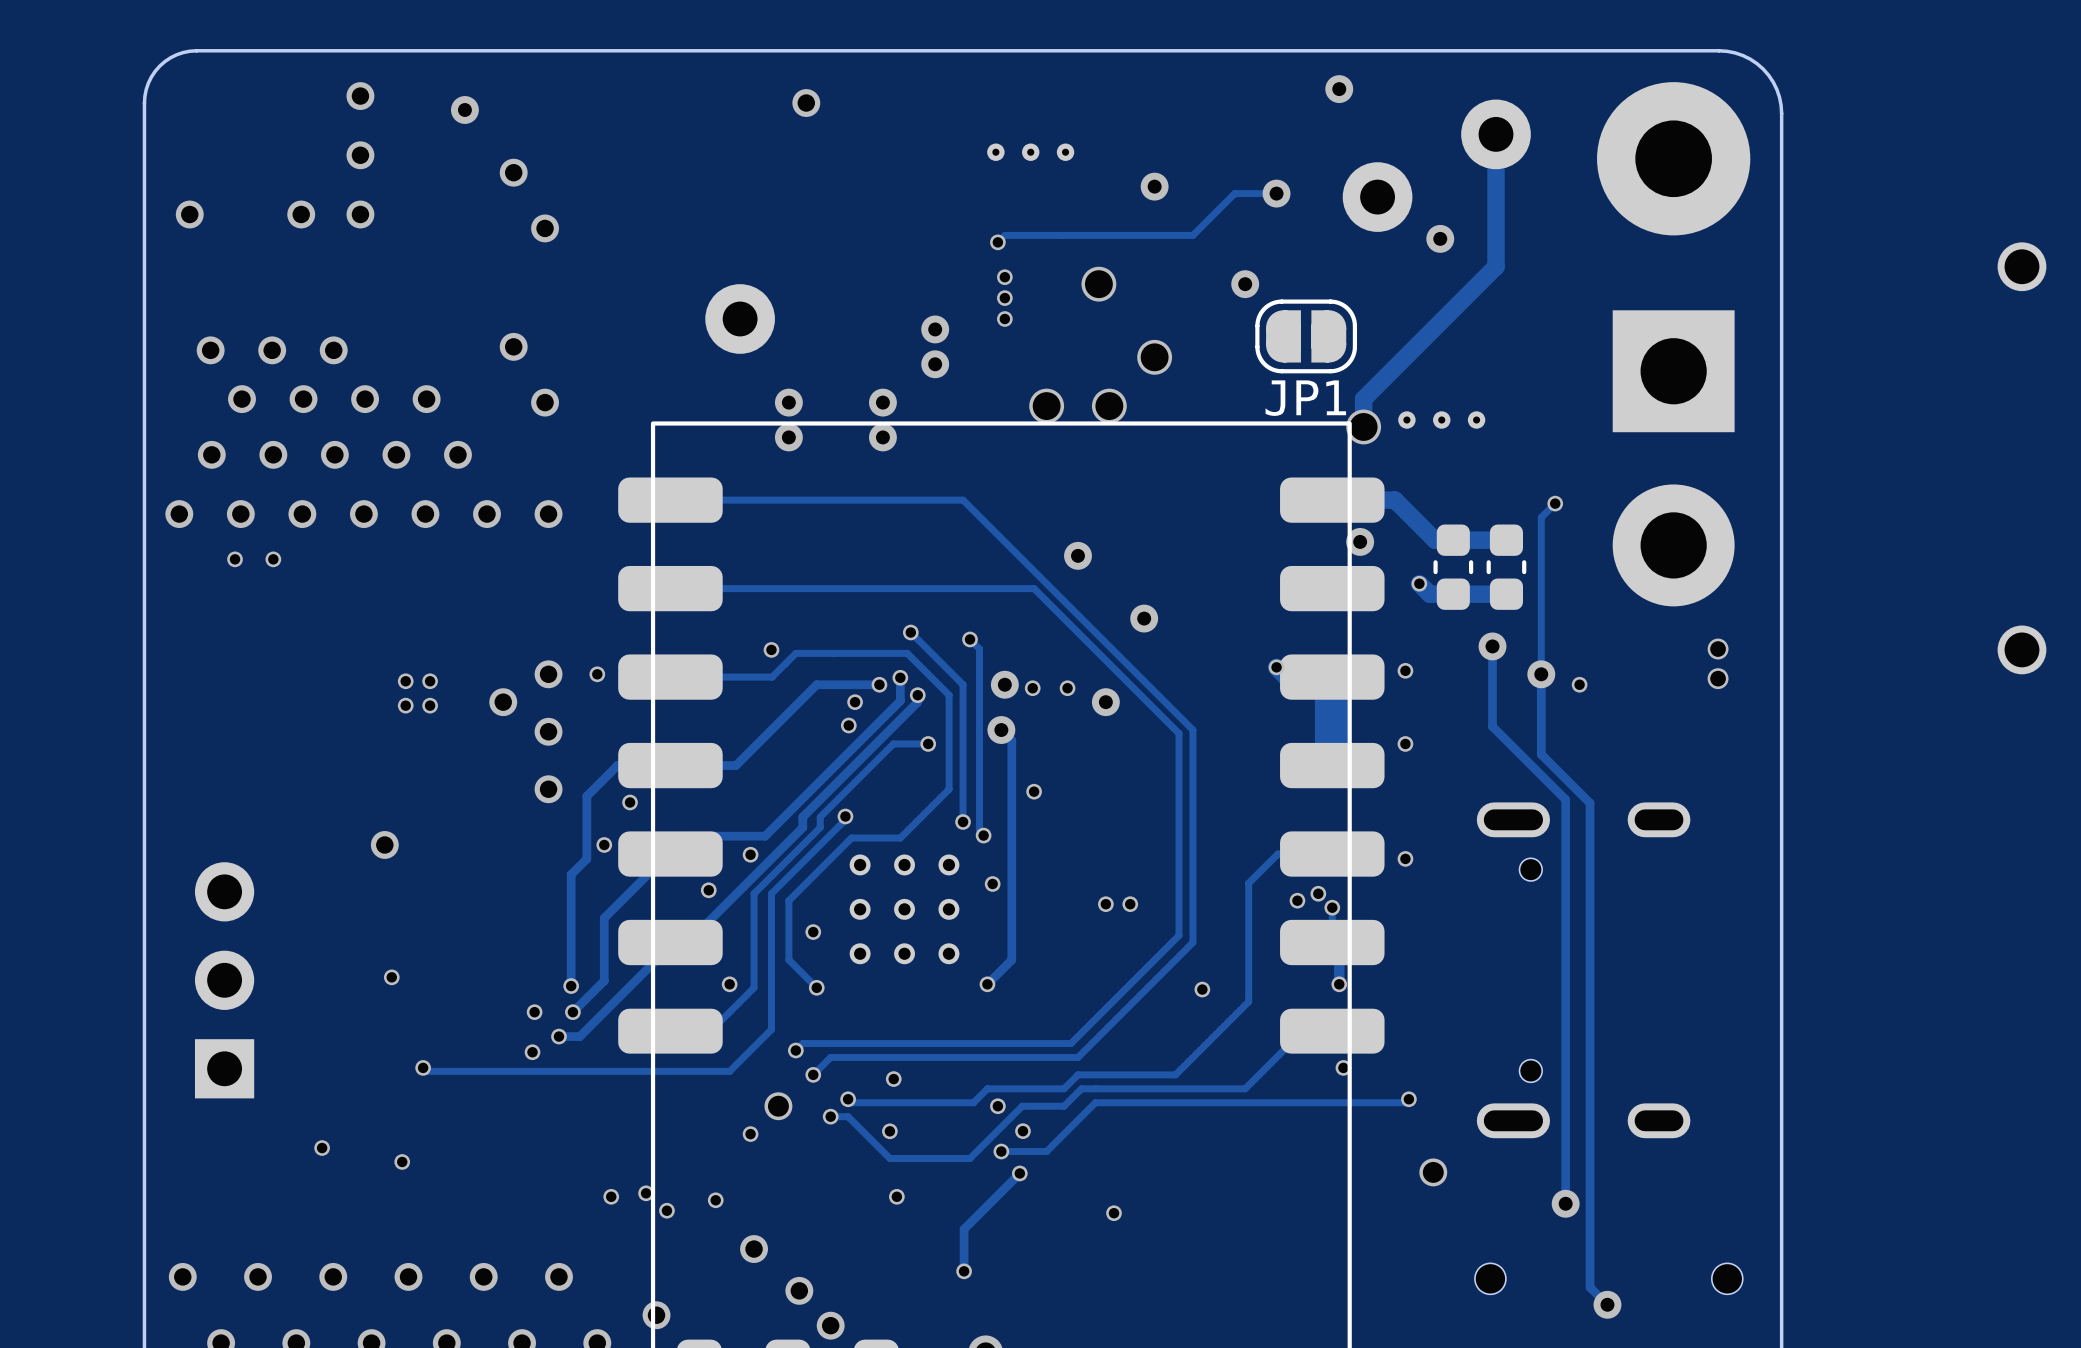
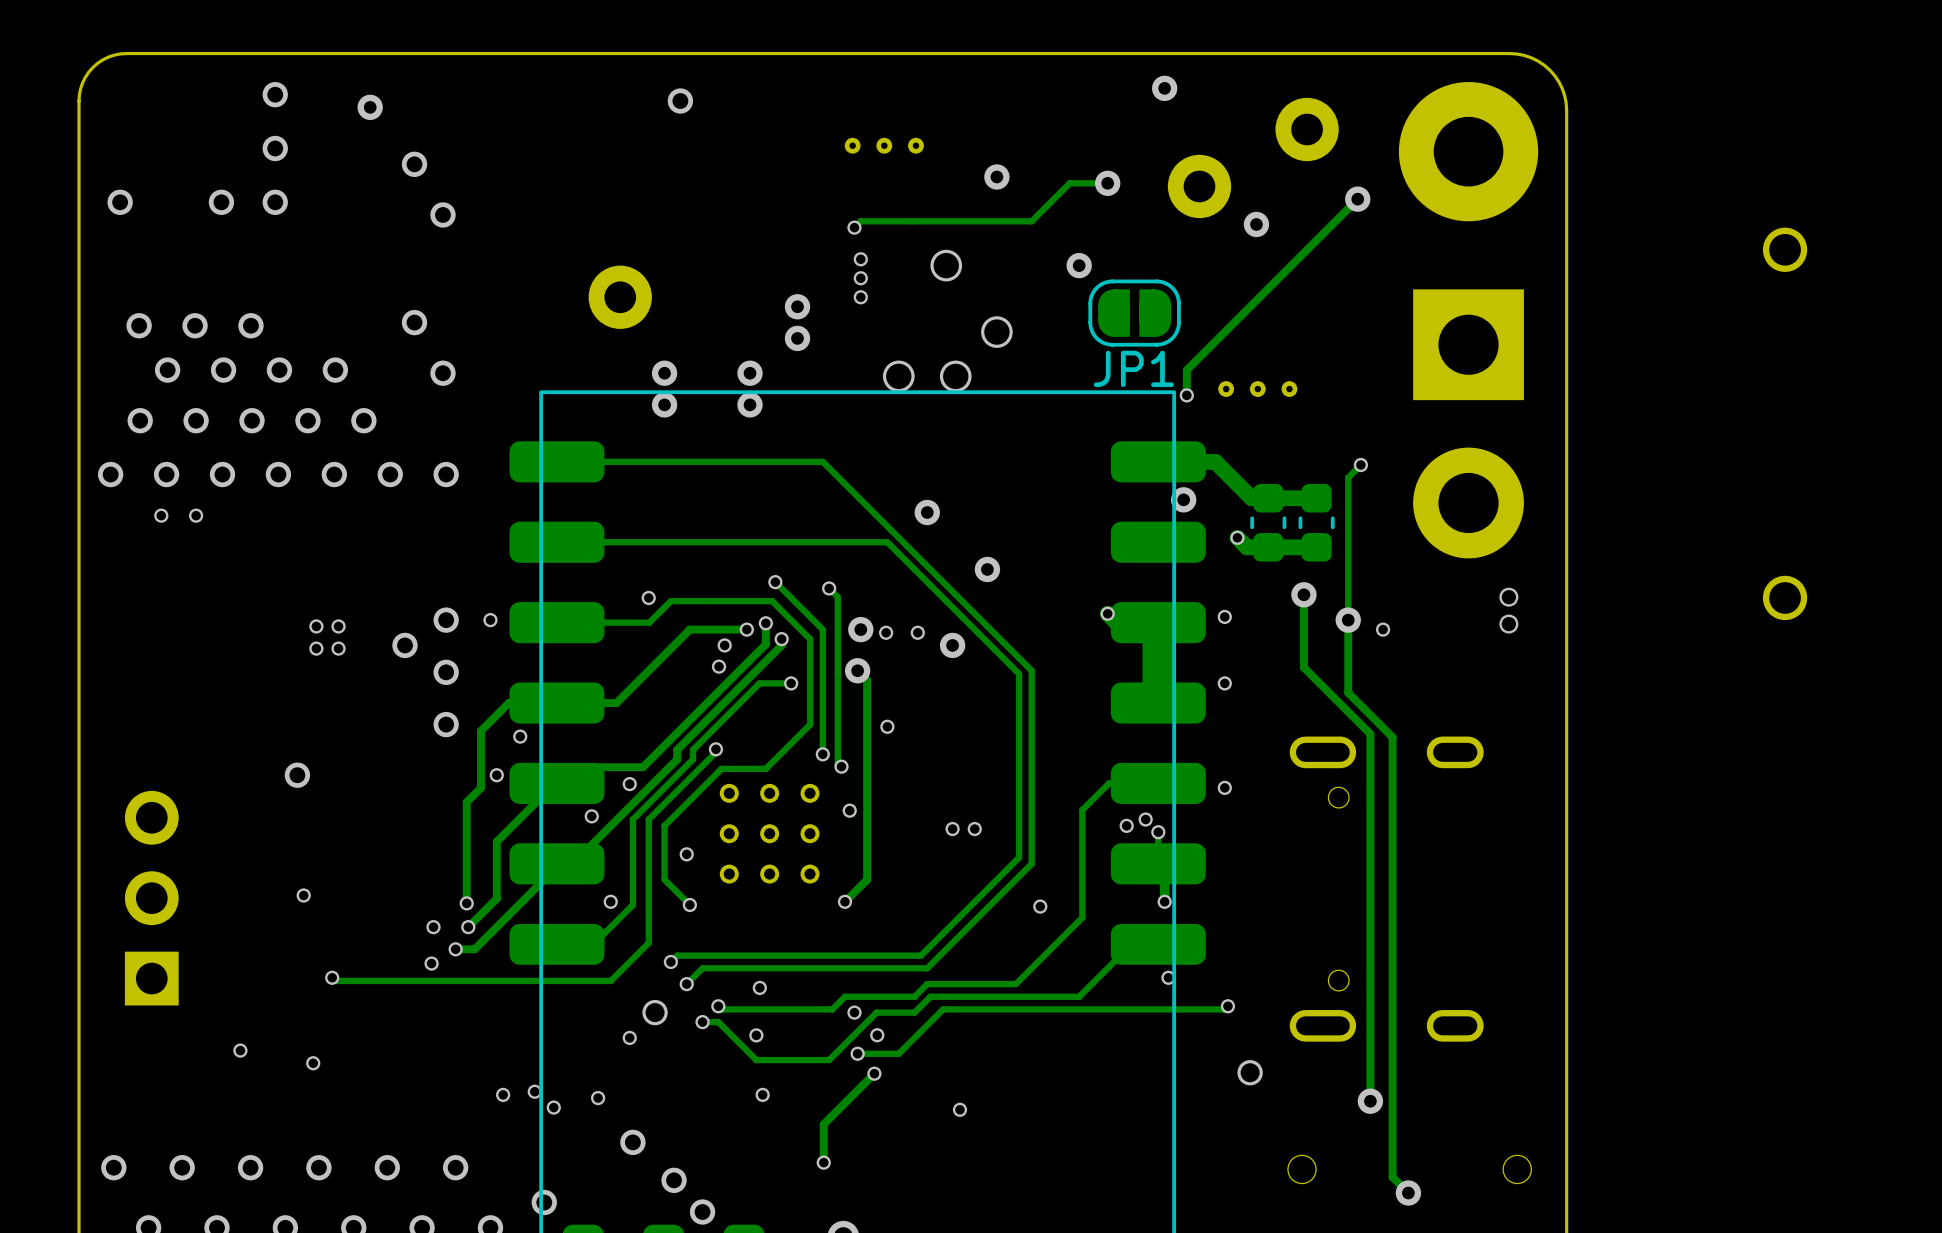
track: (1496, 134) (1496, 266) -> (1357, 199) (1307, 249)
via: none -> (1357, 199)
track width: thick (1496, 266) (1363, 399) (1363, 426) -> thin (1307, 249) (1186, 370) (1186, 395)
via size: [1346, 409, 1382, 445] -> [1179, 388, 1194, 403]

